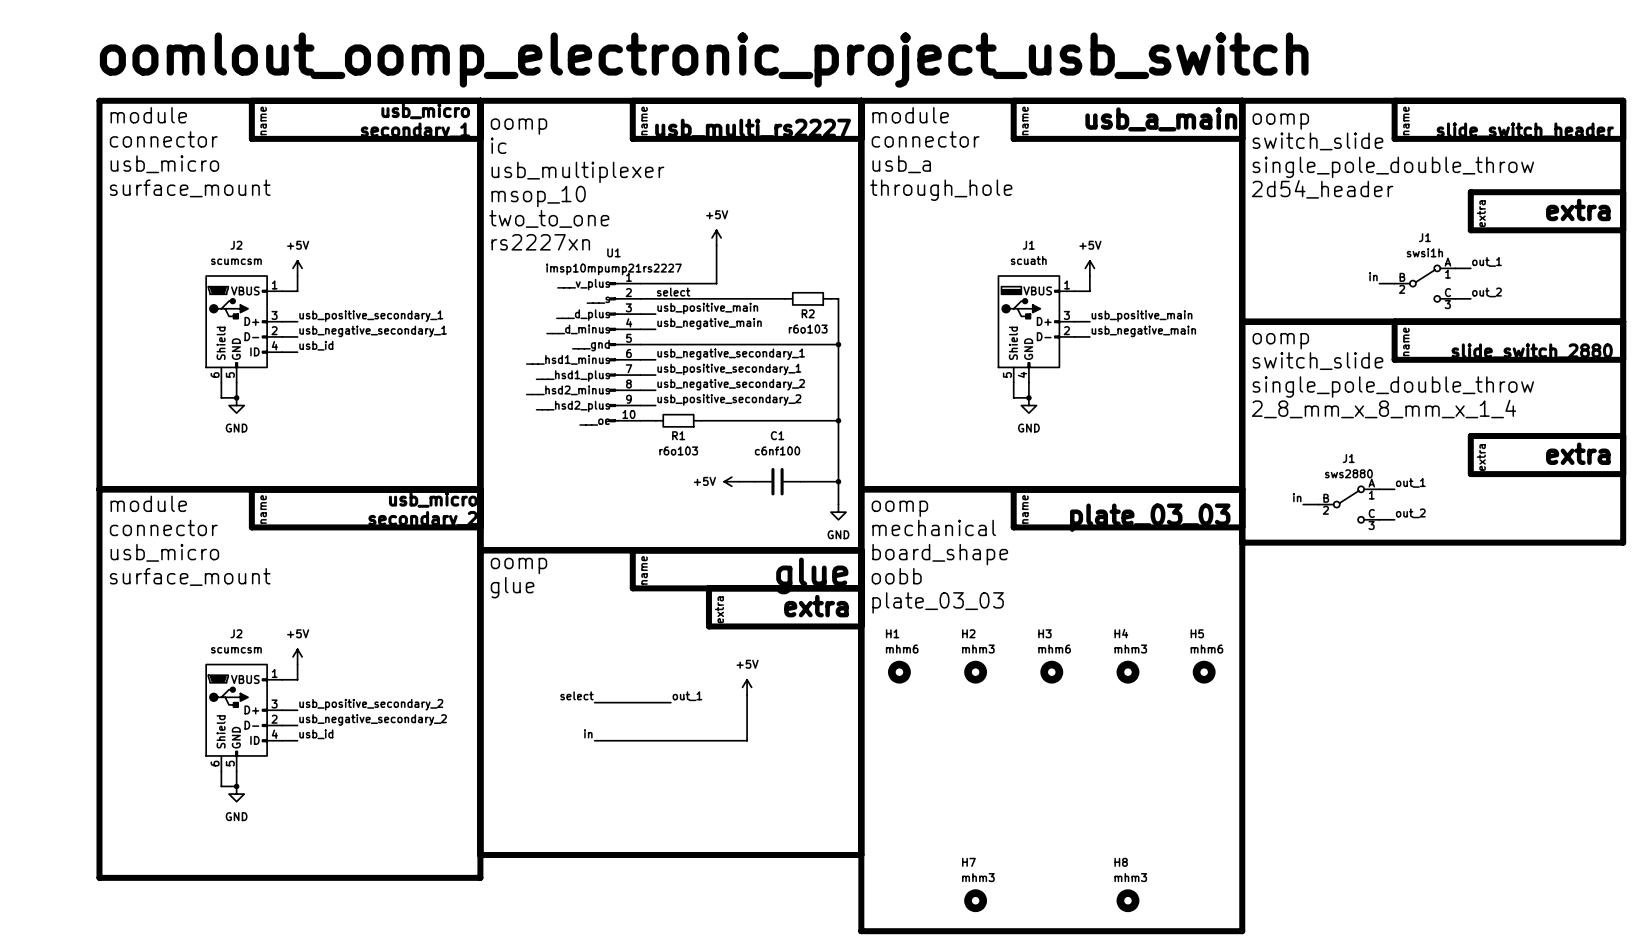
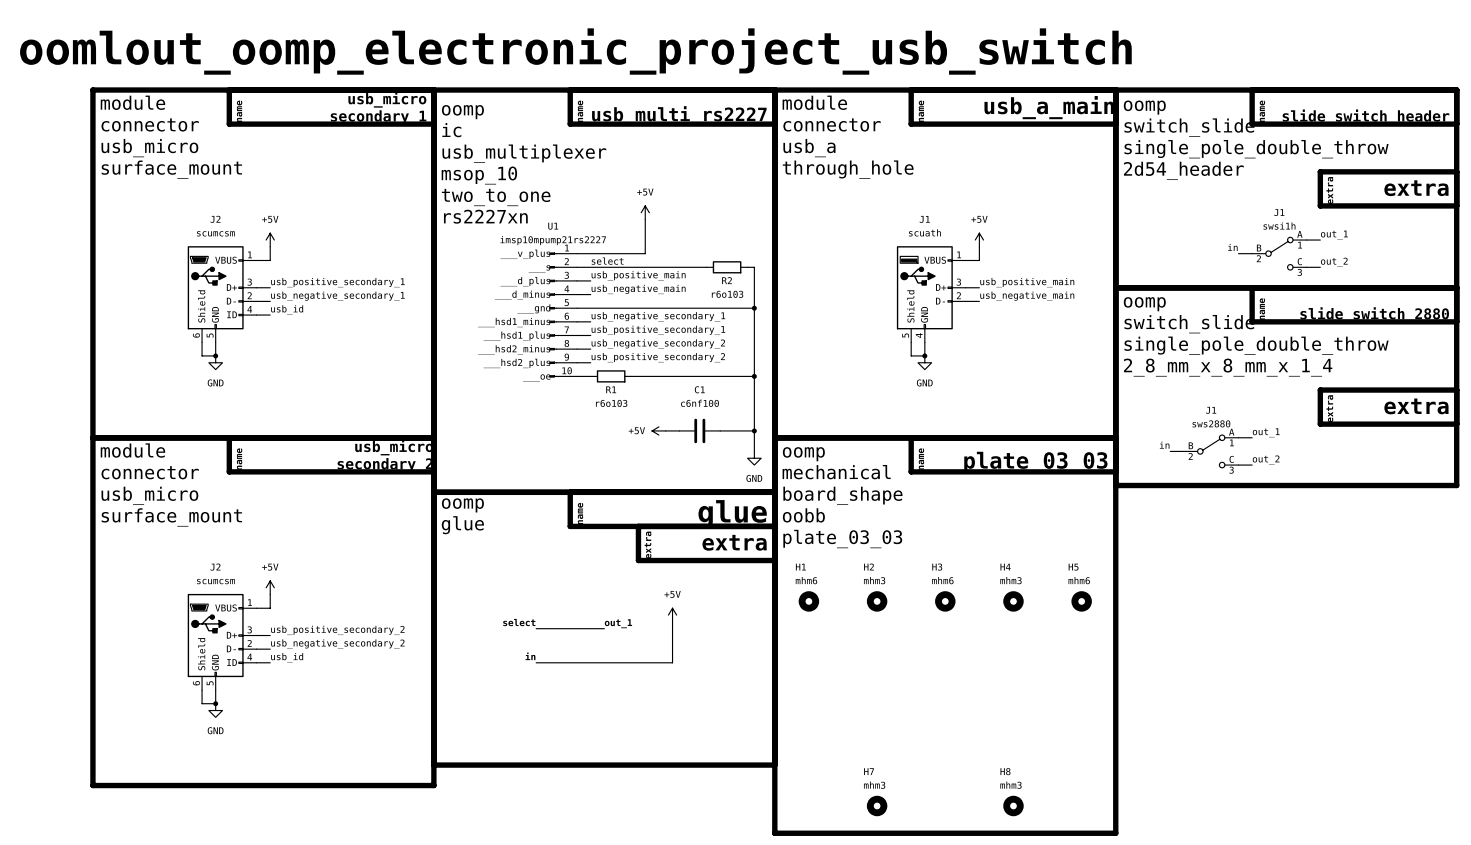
text position: oomlout_oomp_electronic_project_usb_switch (704, 60) -> oomlout_oomp_electronic_project_usb_switch (575, 51)

